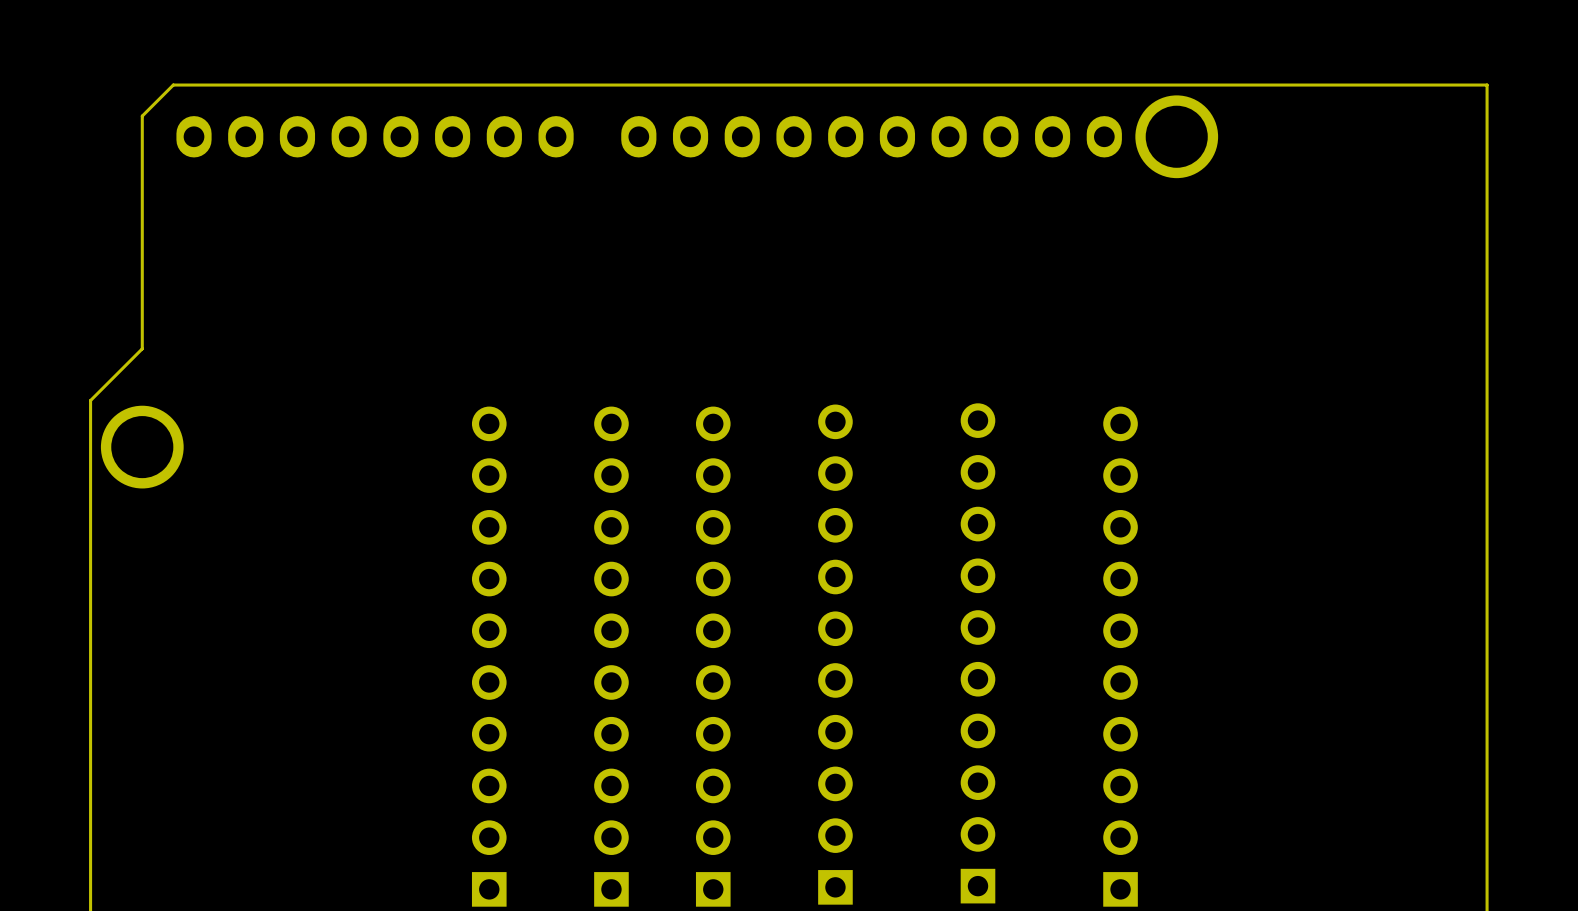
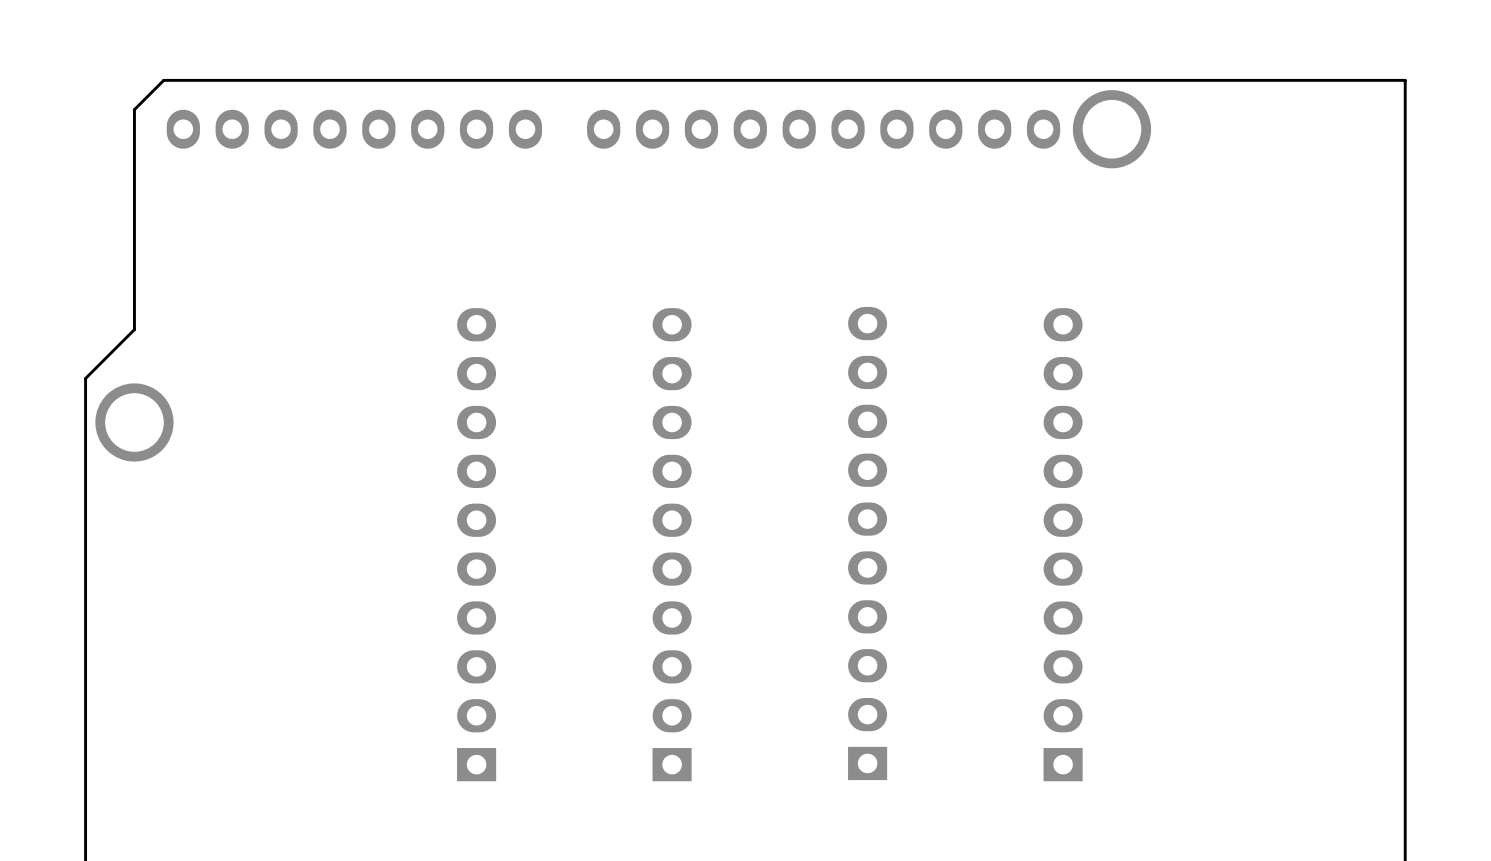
part: none -> (867, 543)
part: none -> (476, 544)
part: none -> (672, 544)
part: none -> (1063, 544)
part: (977, 653) -> none
part: (835, 654) -> none
part: (489, 656) -> none
part: (611, 656) -> none
part: (713, 656) -> none
part: (1120, 656) -> none

